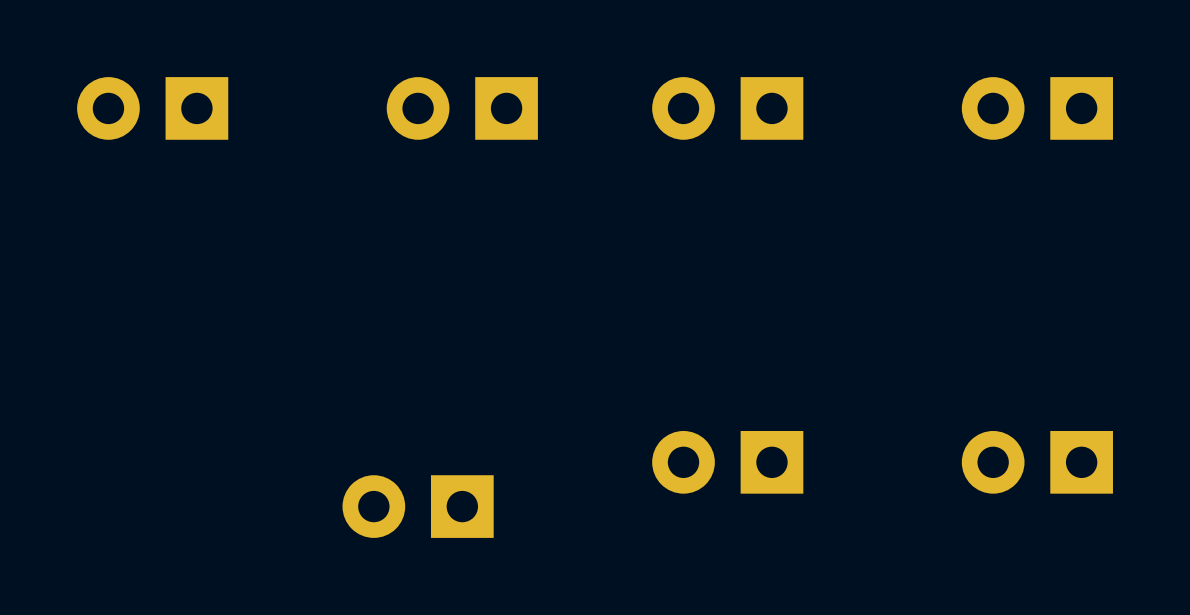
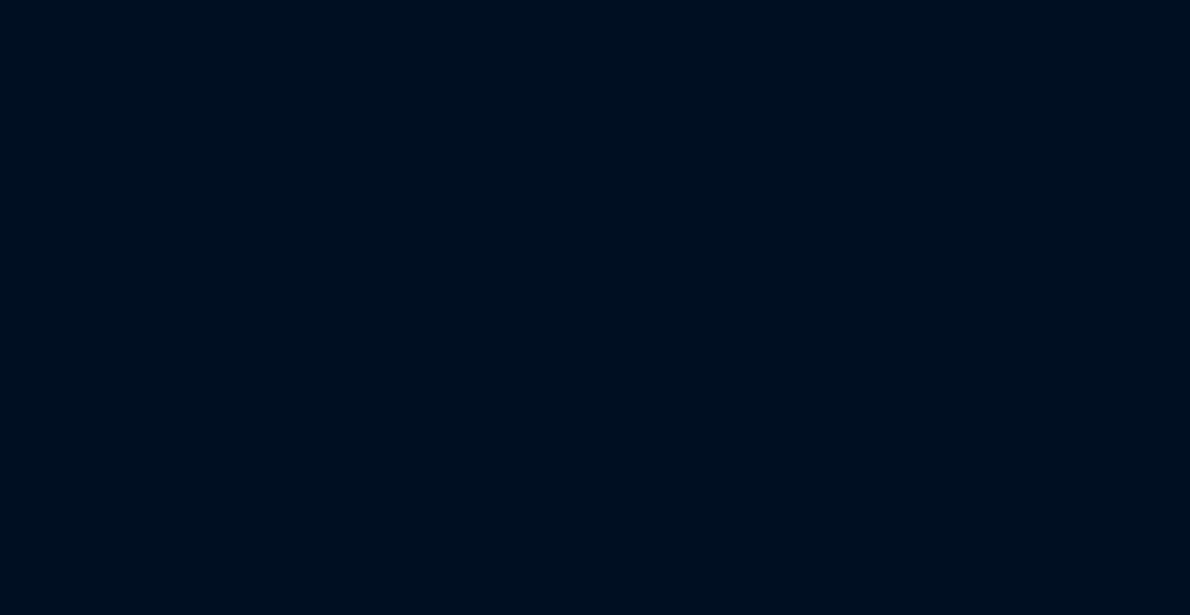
part: (152, 108) -> none
part: (462, 108) -> none
part: (727, 108) -> none
part: (1037, 108) -> none
part: (727, 462) -> none
part: (1037, 462) -> none
part: (418, 506) -> none

